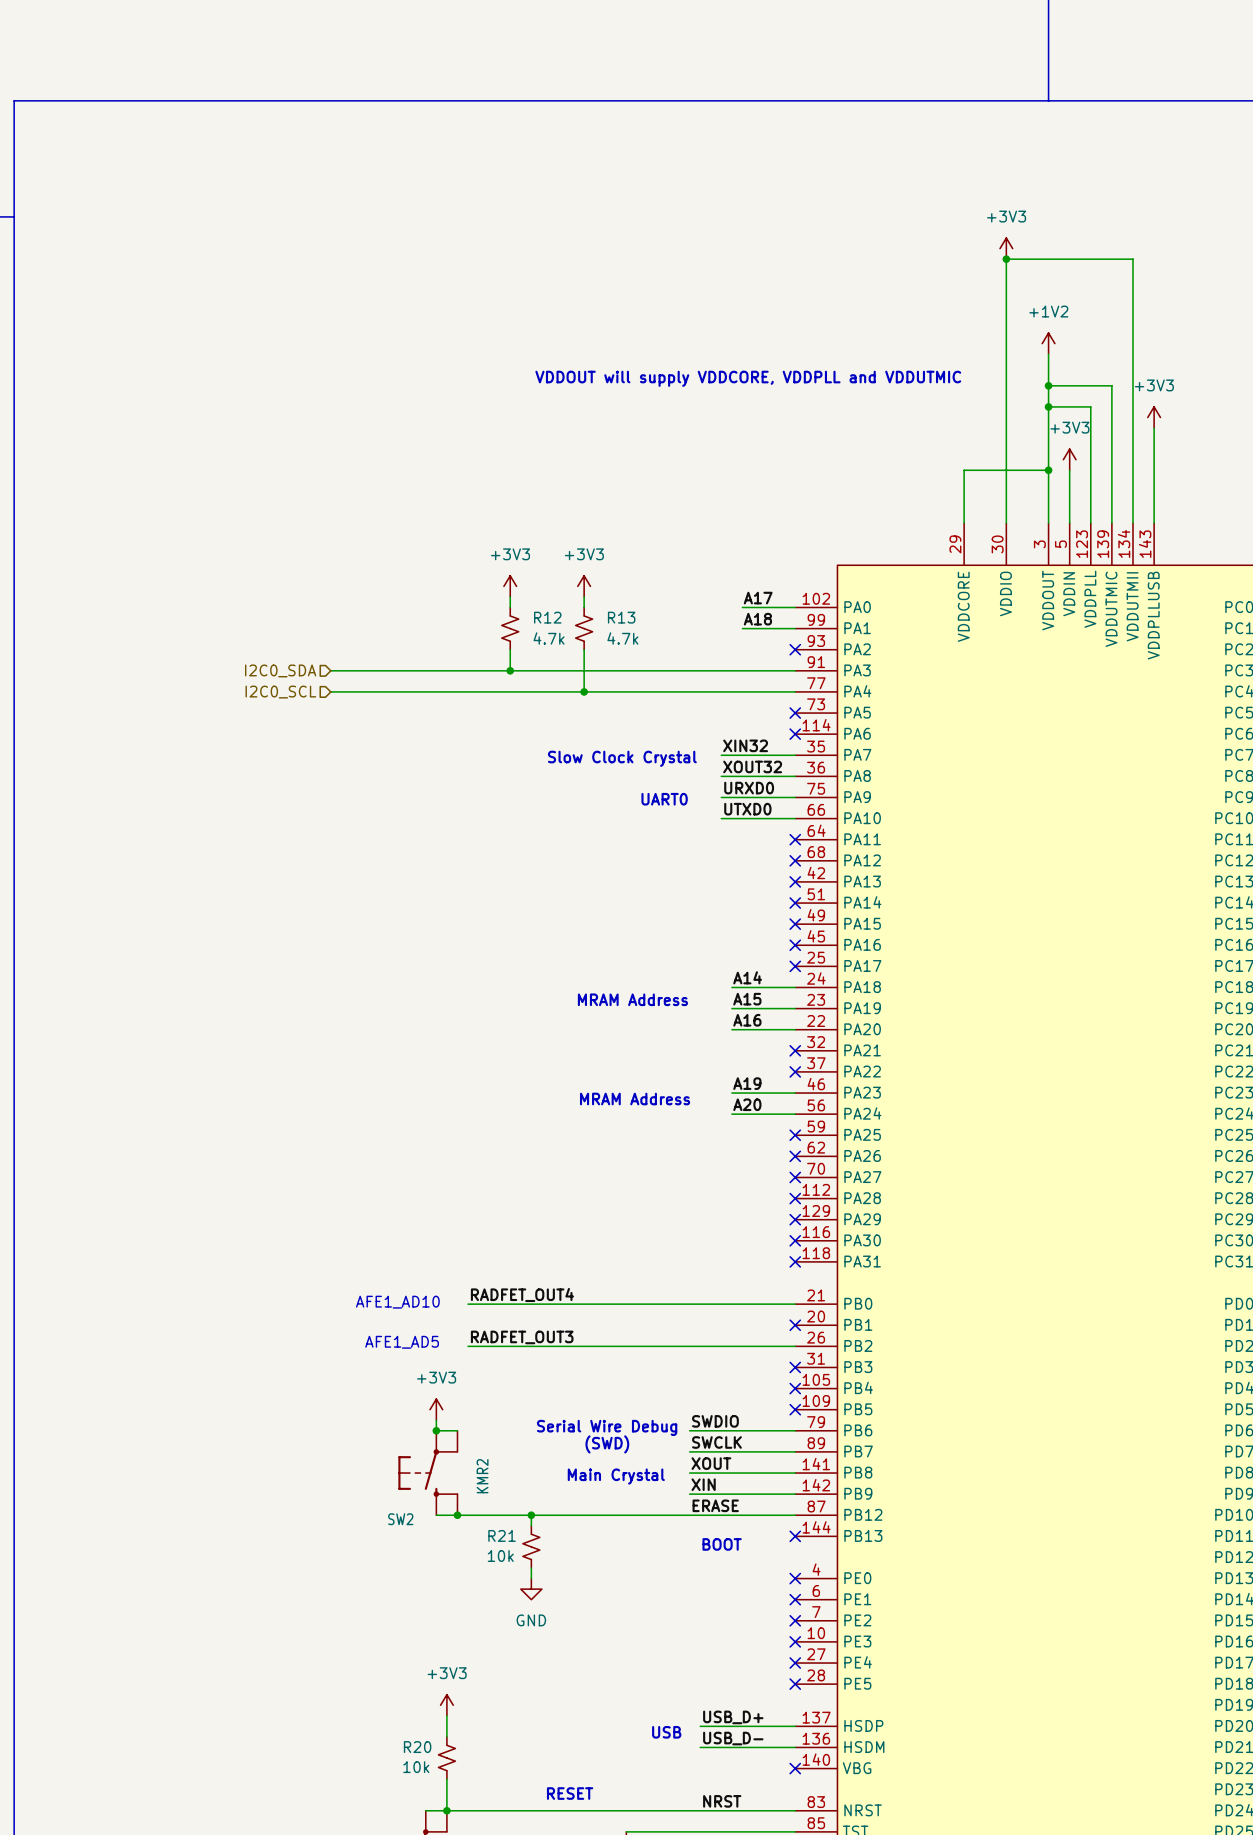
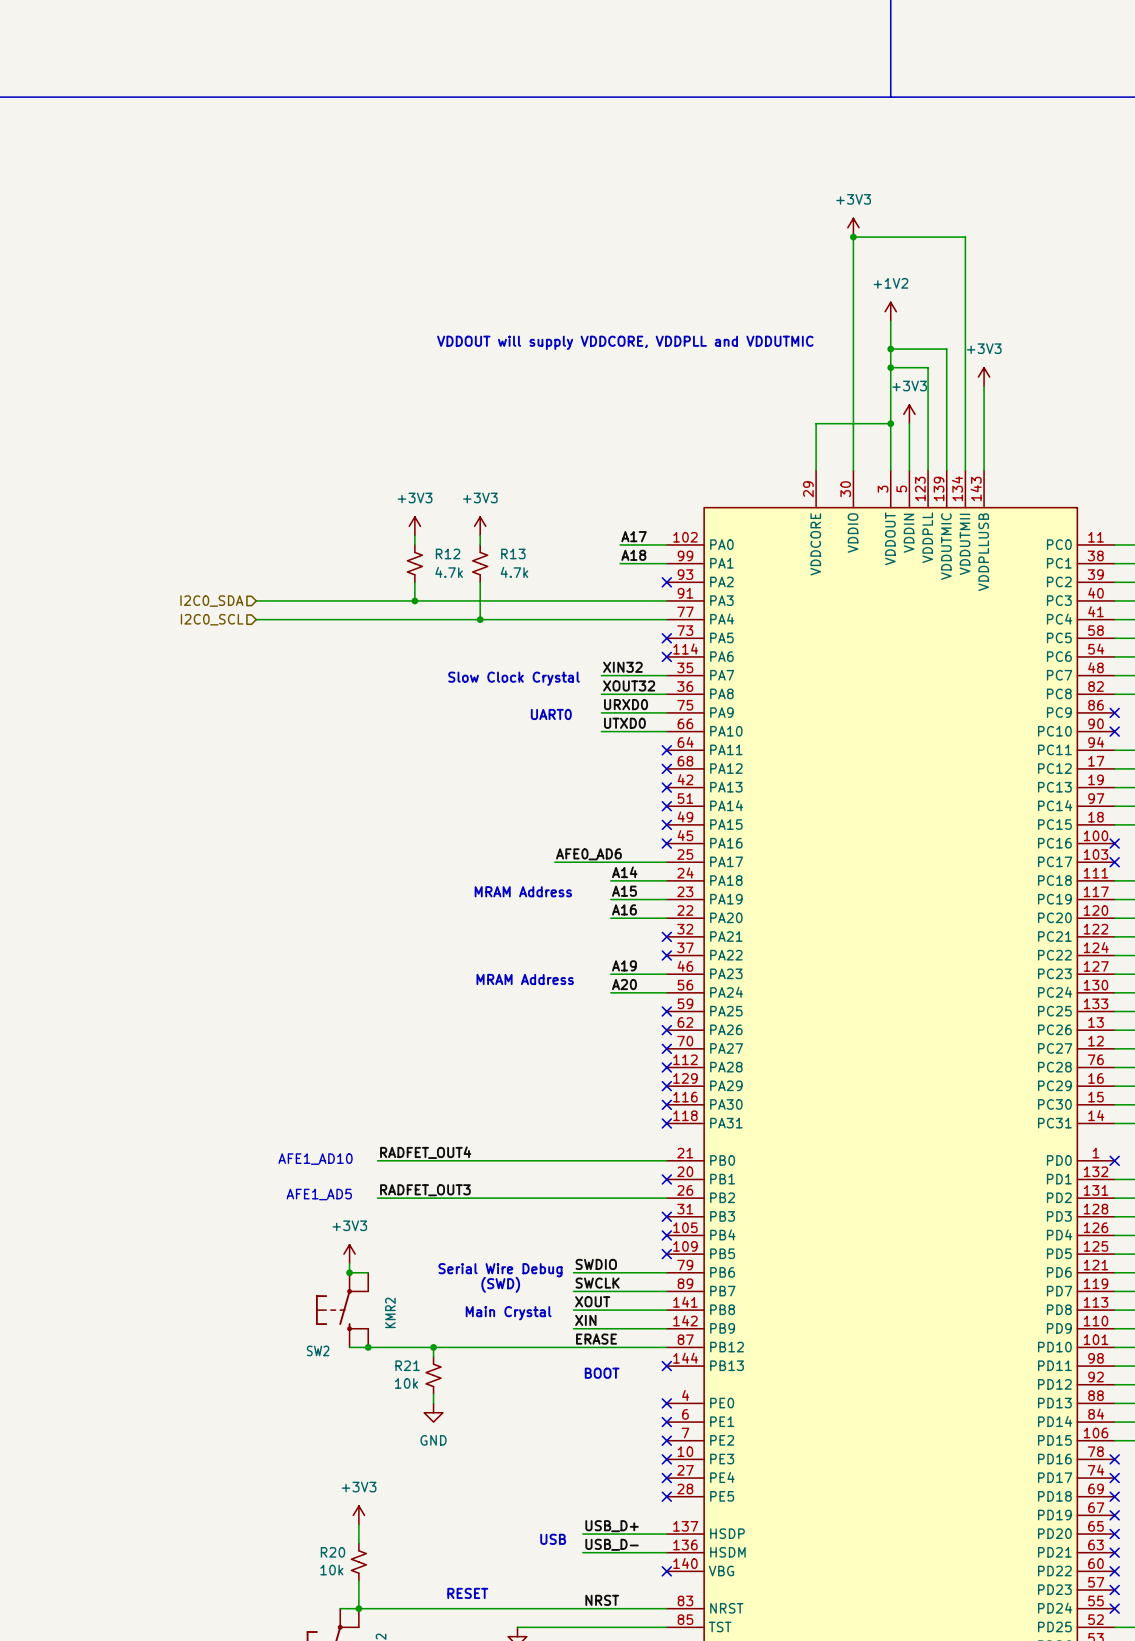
label: none -> AFE0_AD6 (588, 854)
wire: none -> (554, 862) (666, 862)
no-connect mark: (795, 966) -> none

